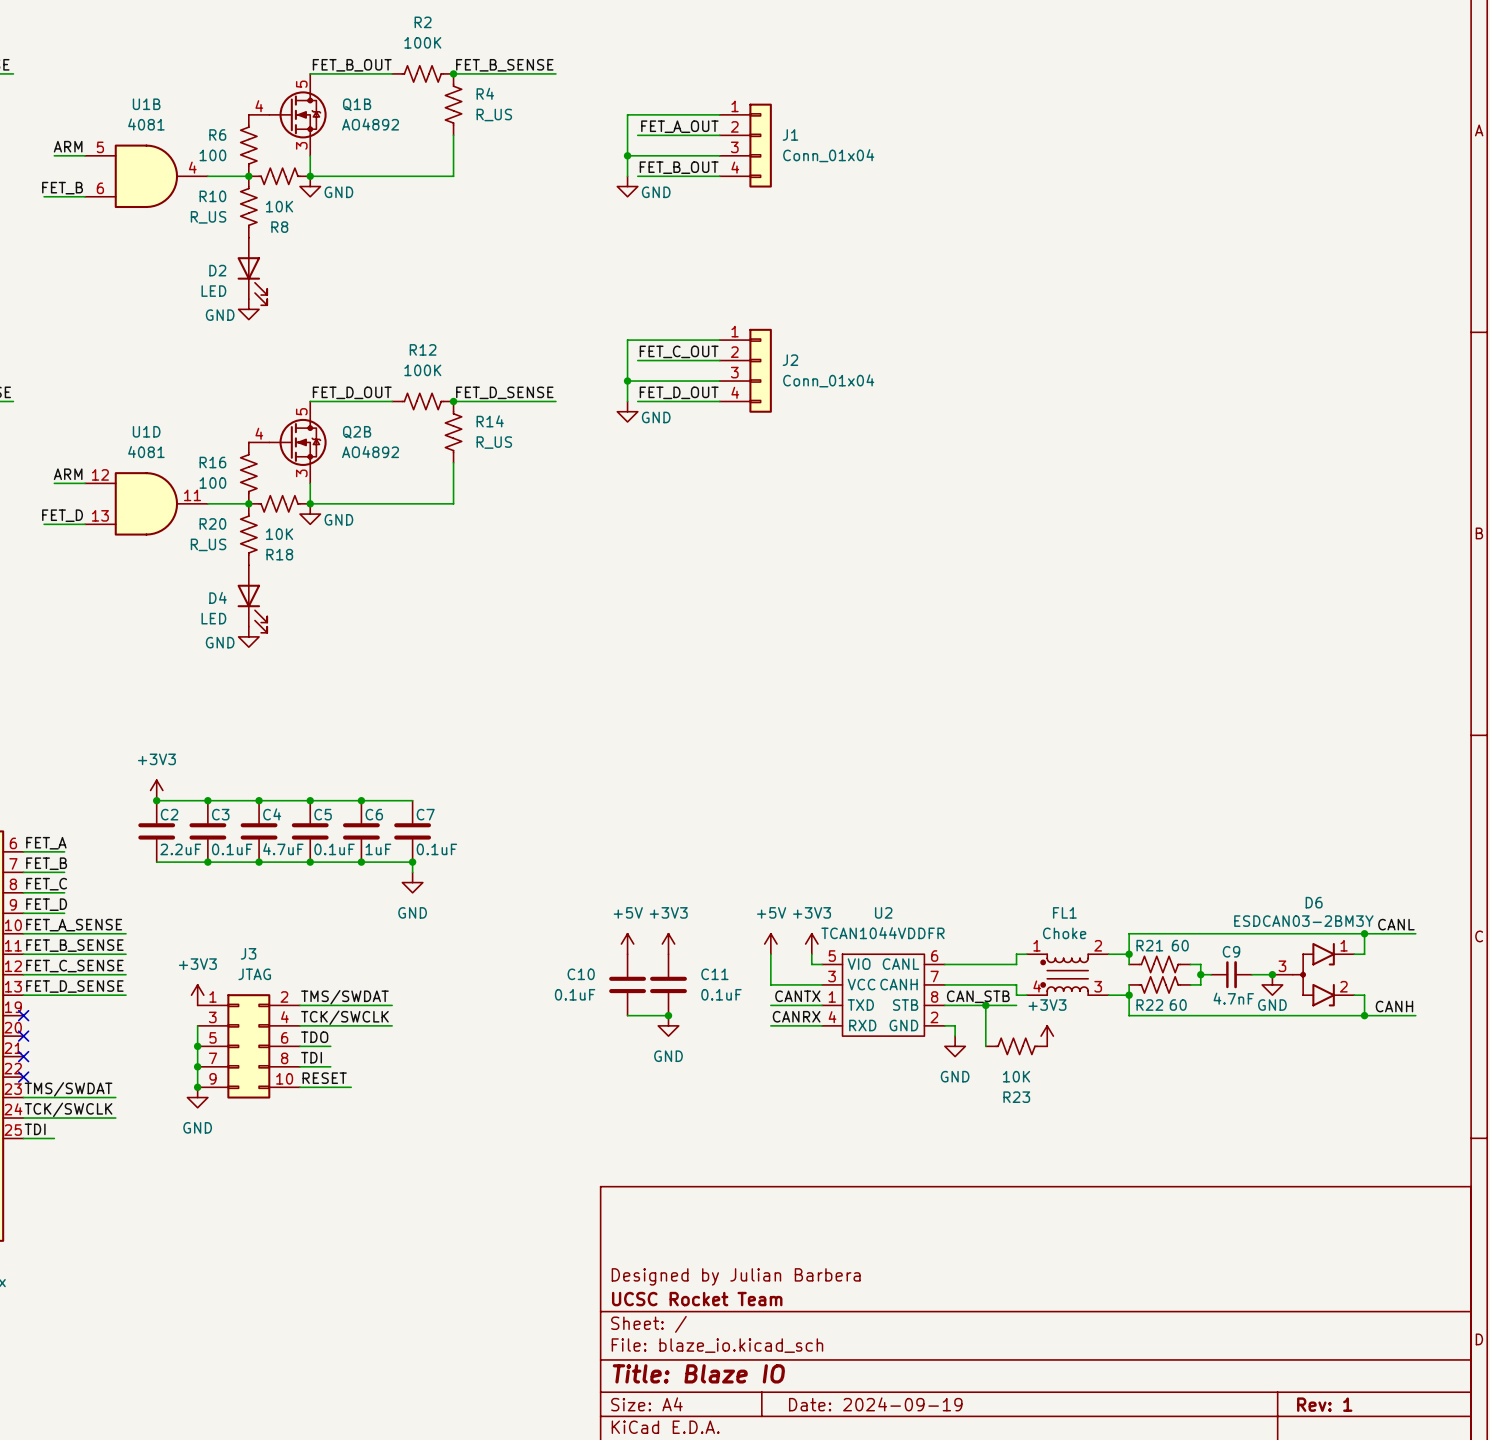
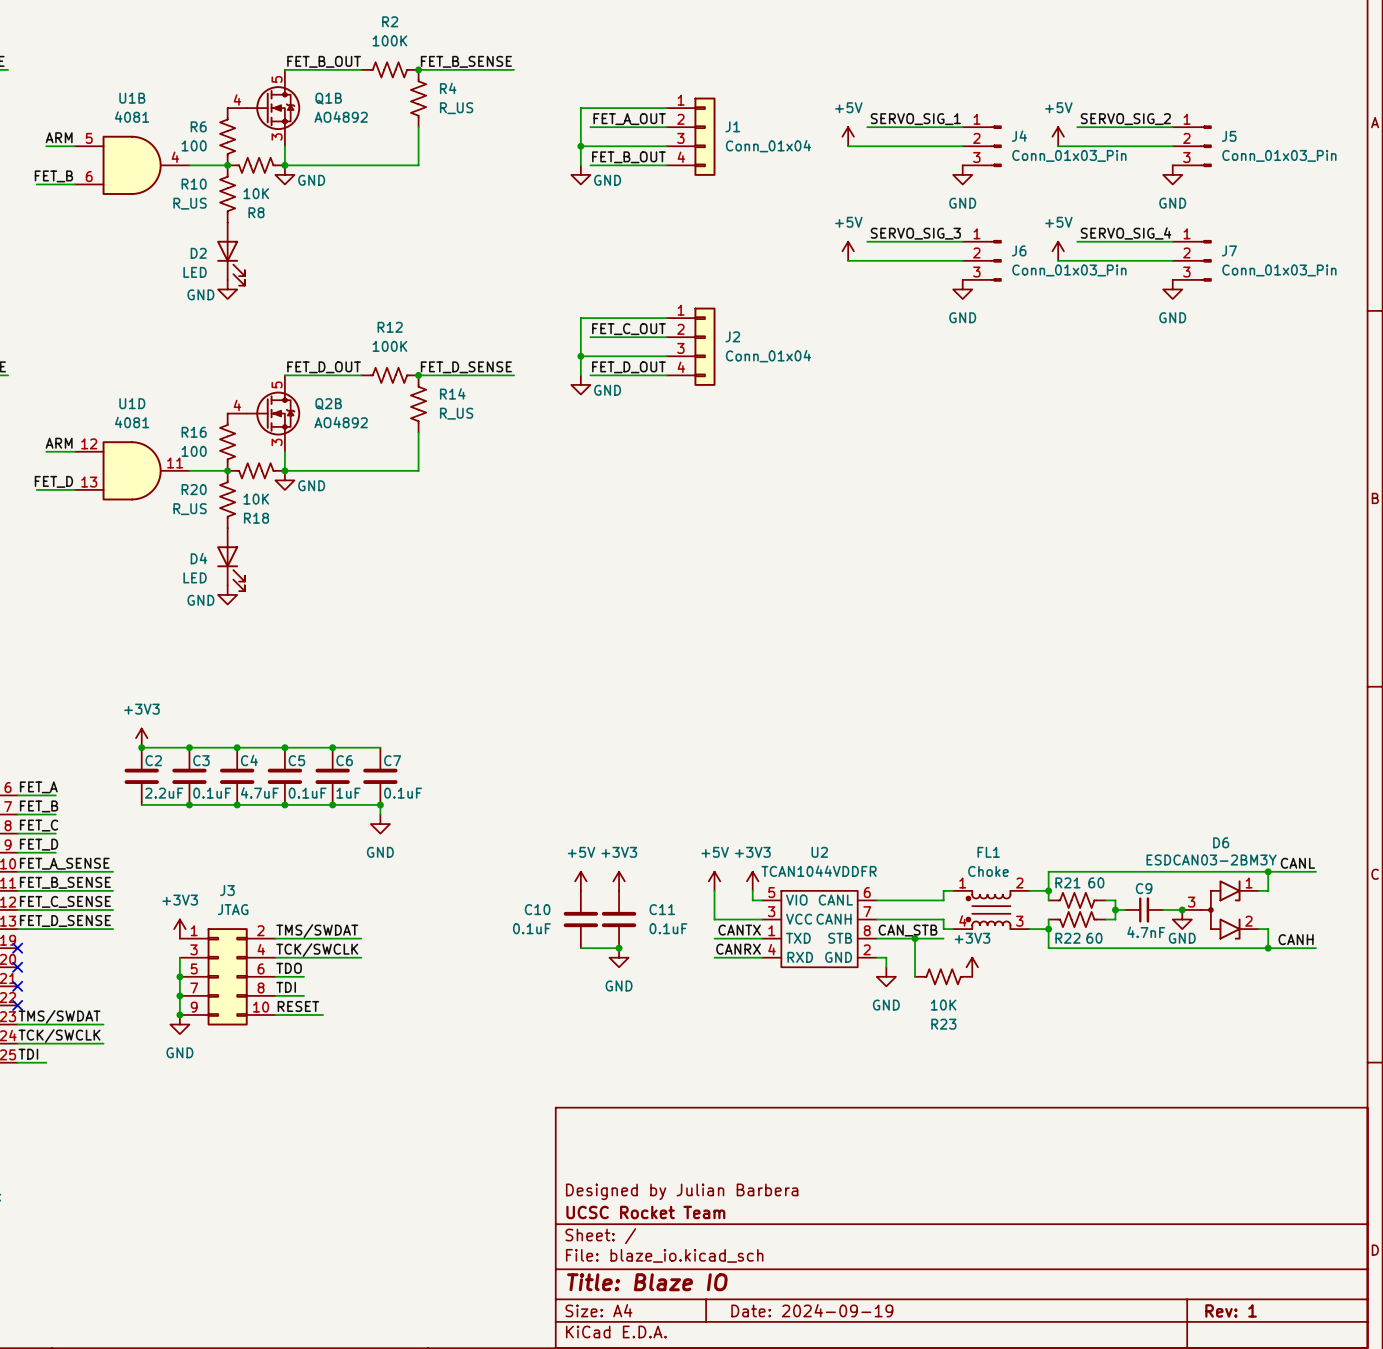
label: none -> SERVO_SIG_1 (915, 119)
label: none -> SERVO_SIG_2 (1125, 119)
wire: none -> (867, 127) (962, 127)
wire: none -> (1077, 127) (1172, 127)
power symbol: none -> +5V (848, 136)
power symbol: none -> +5V (1058, 136)
wire: none -> (848, 146) (962, 146)
J4: none -> Conn_01x03_Pin (982, 146)
wire: none -> (1058, 146) (1172, 146)
J5: none -> Conn_01x03_Pin (1192, 146)
power symbol: none -> GND (962, 174)
power symbol: none -> GND (1172, 174)
label: none -> SERVO_SIG_3 (915, 233)
label: none -> SERVO_SIG_4 (1126, 233)
wire: none -> (867, 241) (962, 241)
wire: none -> (1077, 241) (1172, 241)
power symbol: none -> +5V (848, 251)
power symbol: none -> +5V (1058, 251)
wire: none -> (848, 260) (962, 260)
J6: none -> Conn_01x03_Pin (982, 260)
wire: none -> (1058, 260) (1172, 260)
J7: none -> Conn_01x03_Pin (1192, 260)
power symbol: none -> GND (962, 289)
power symbol: none -> GND (1172, 289)

